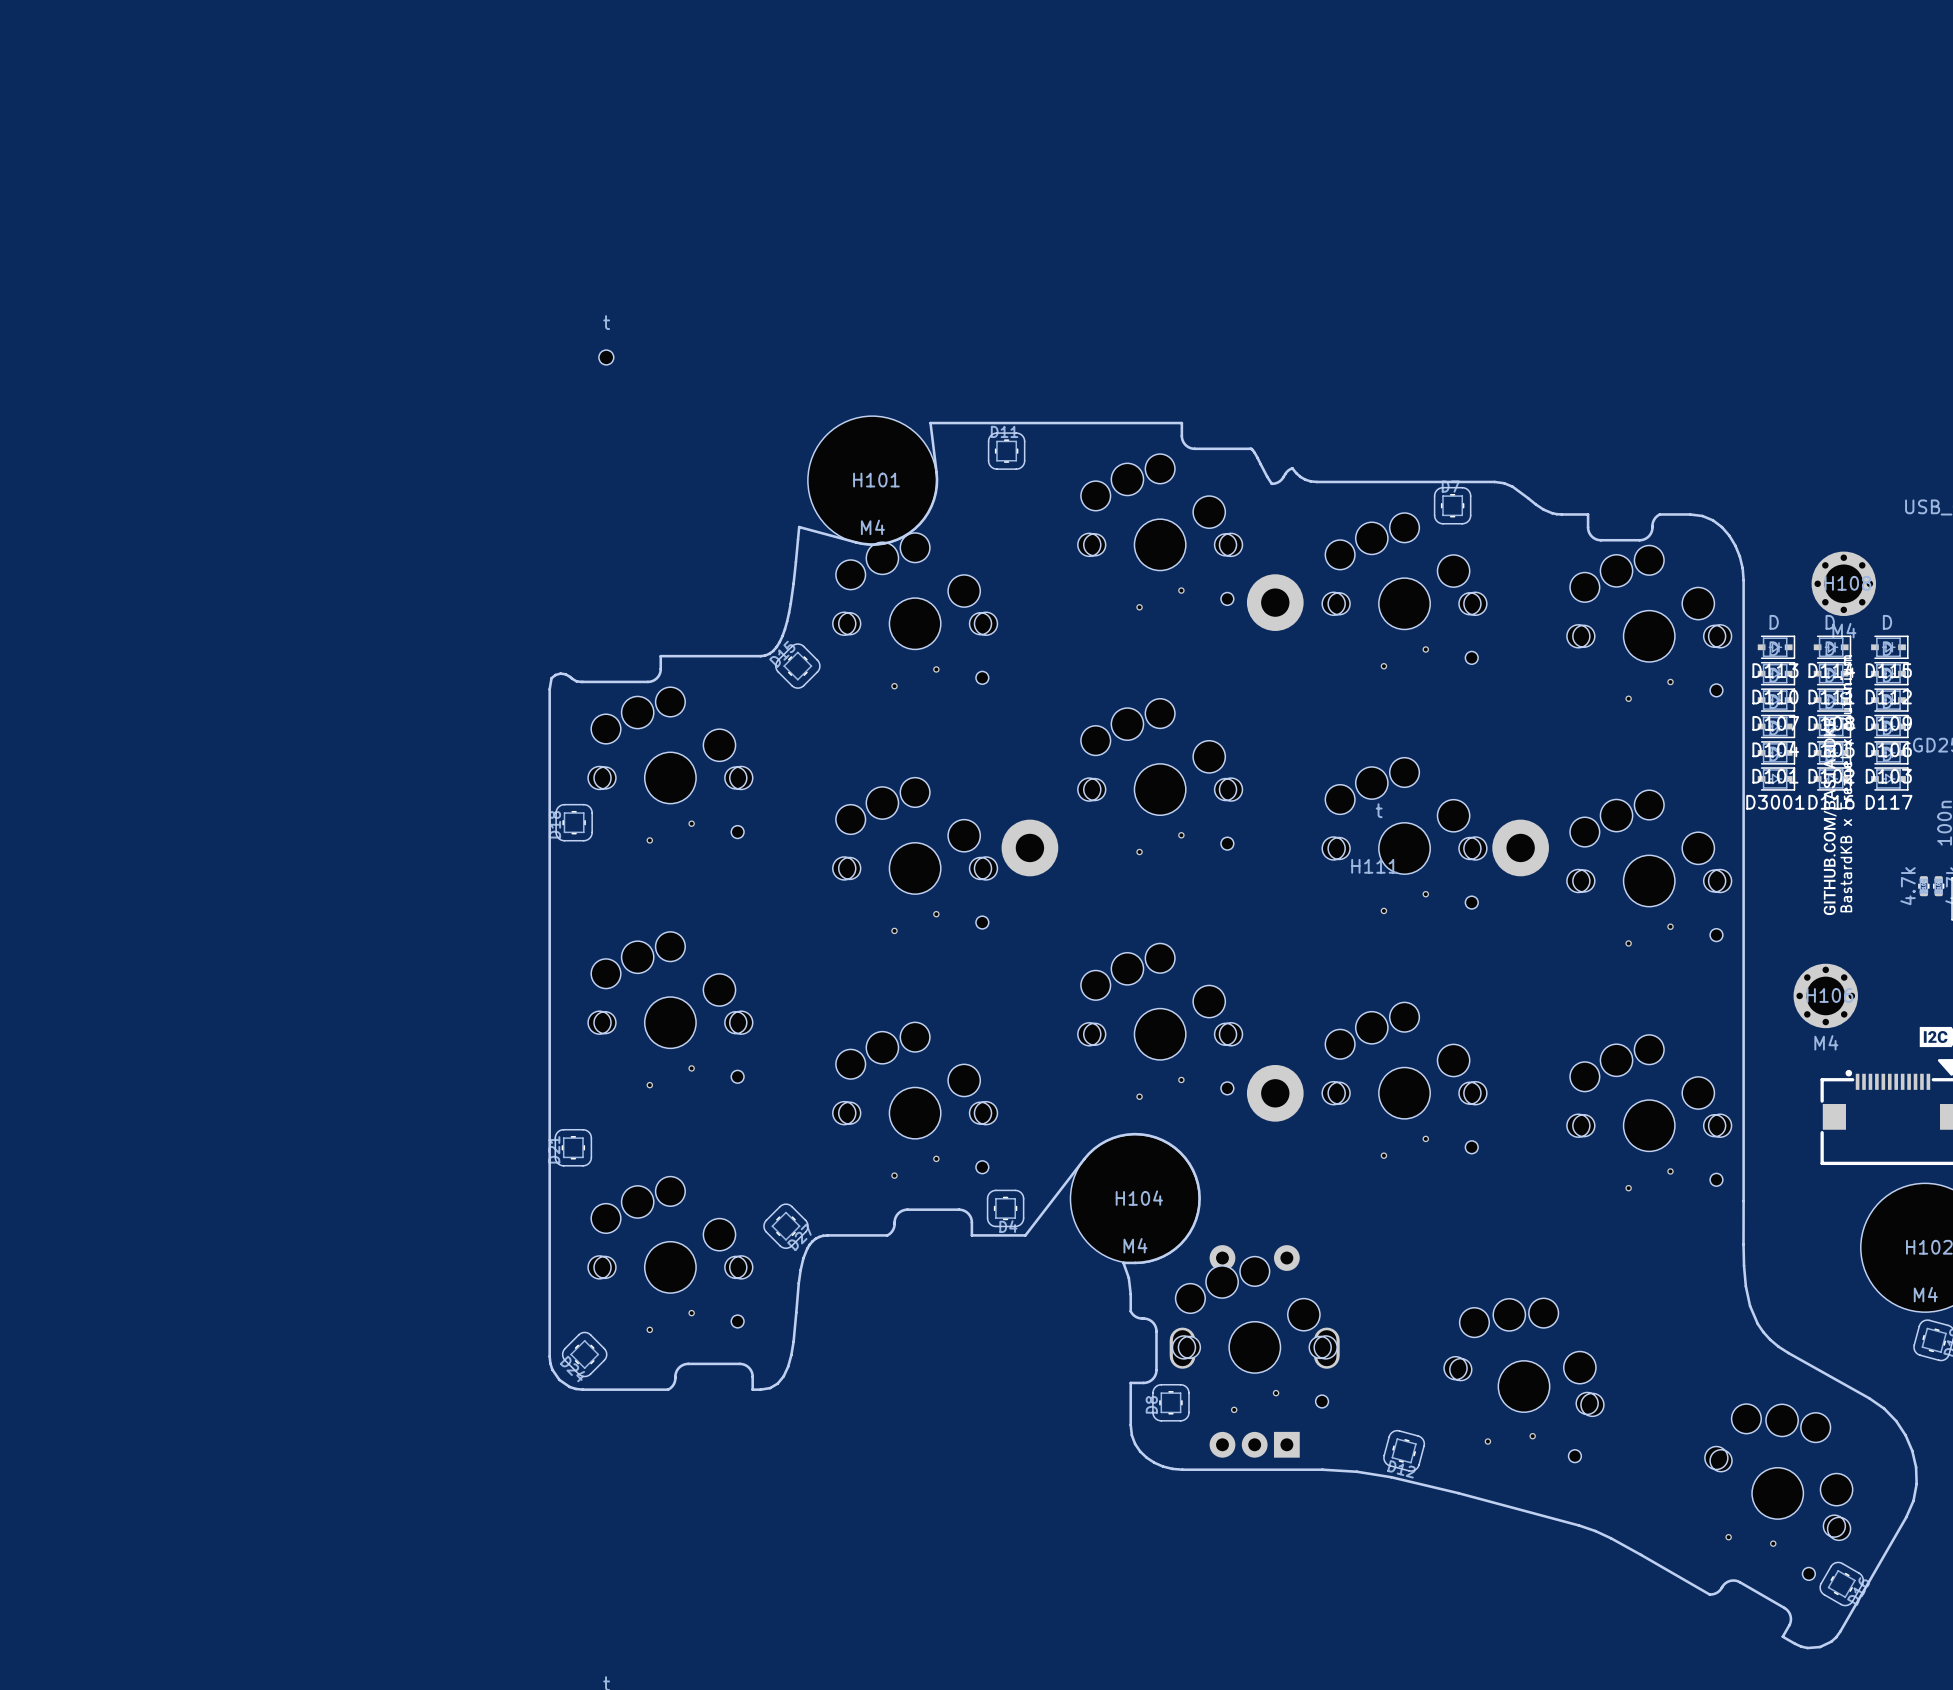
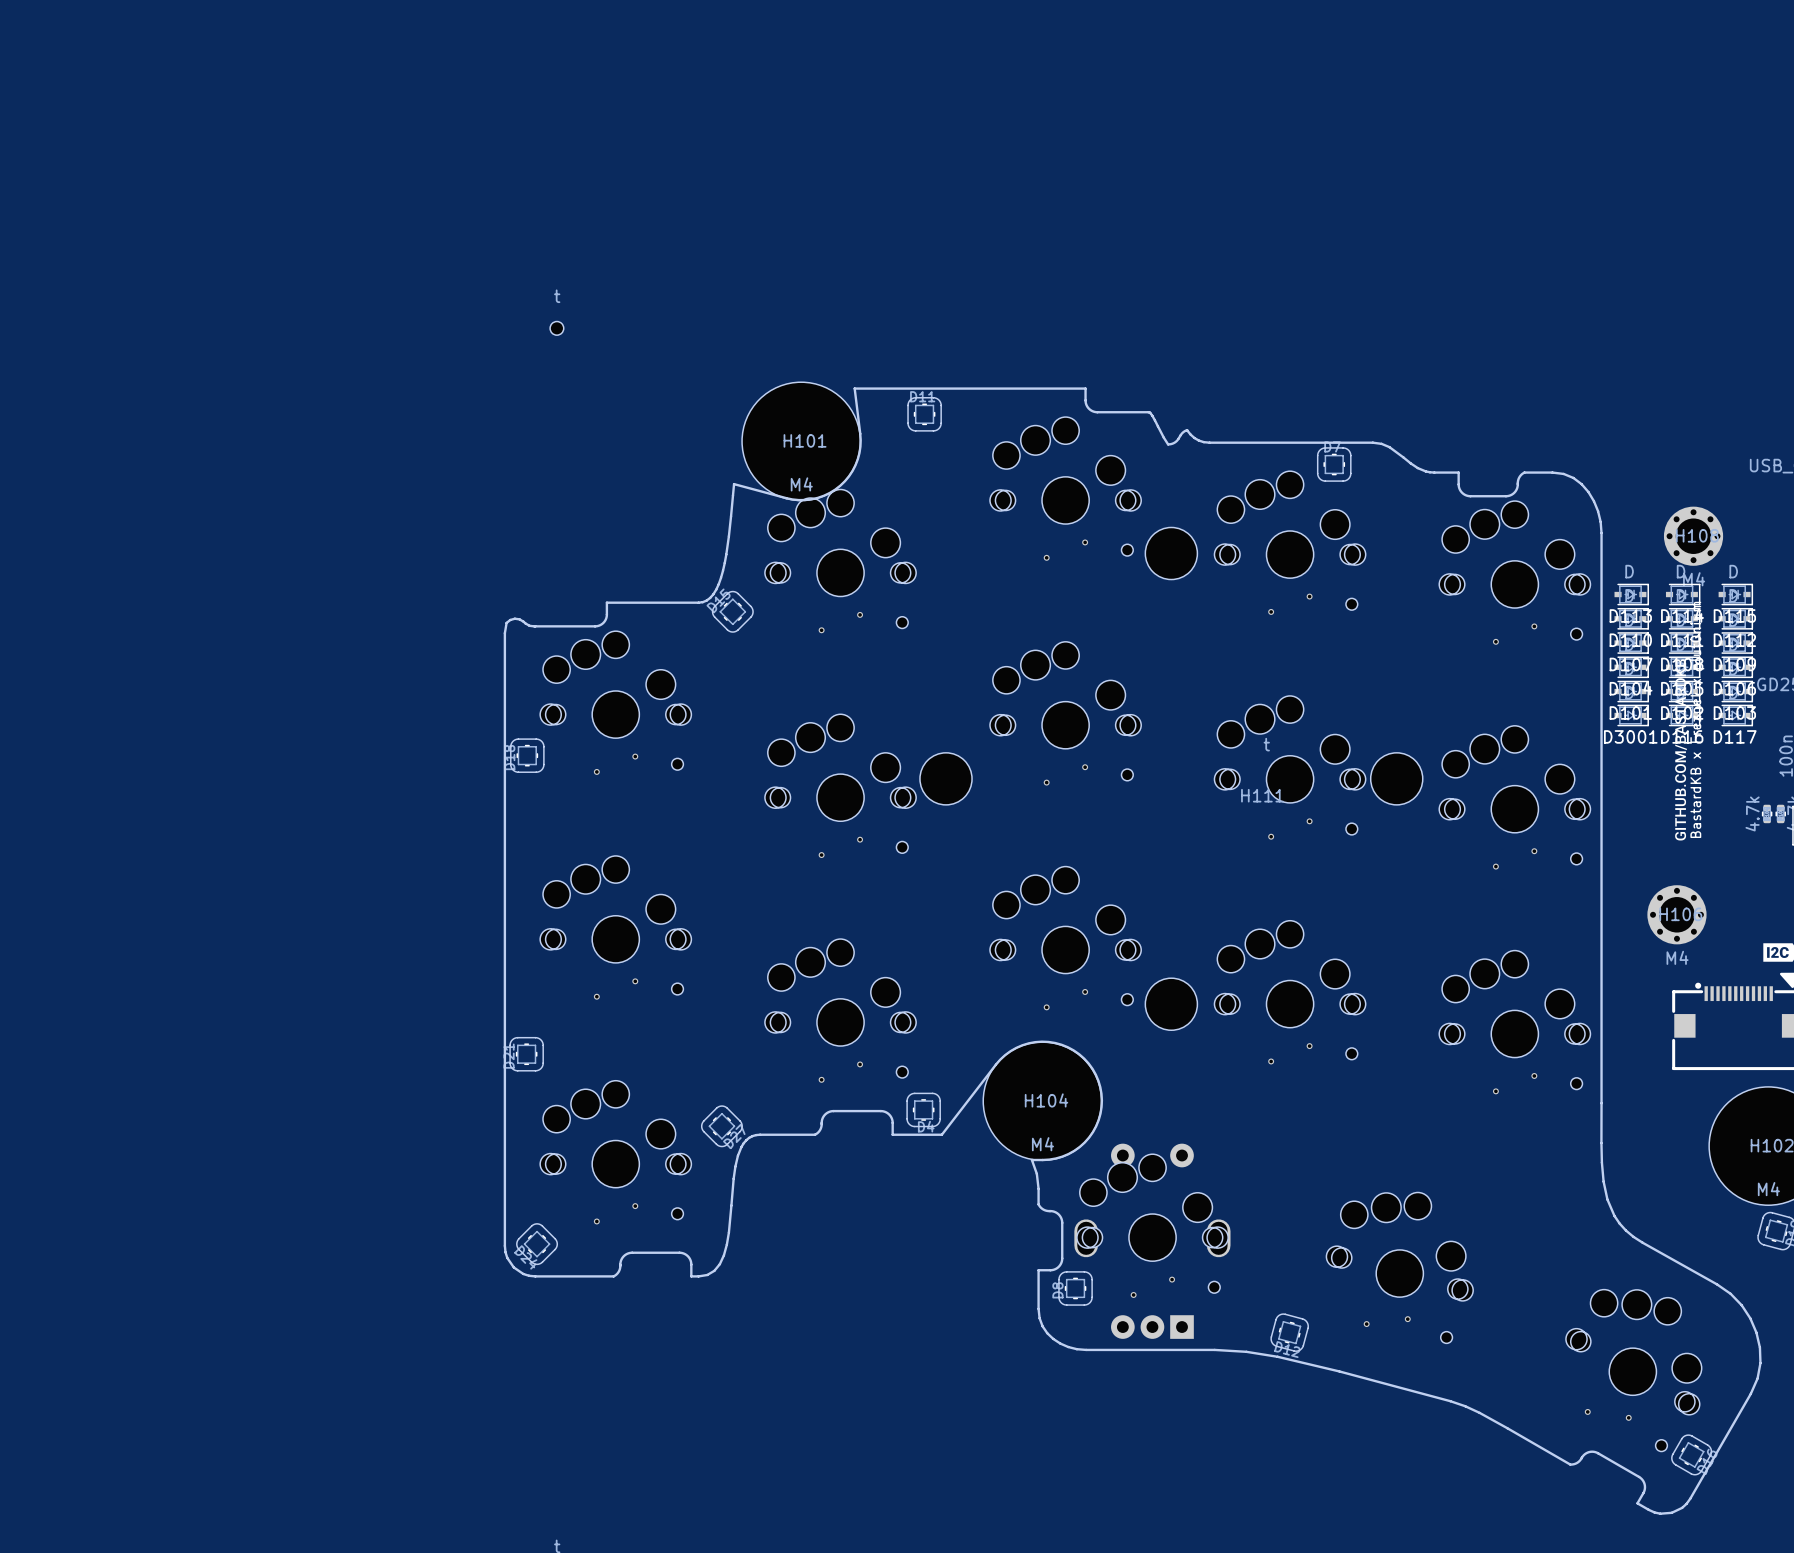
H111 footprint: [1001, 574, 1549, 1122] -> [919, 527, 1423, 1031]

